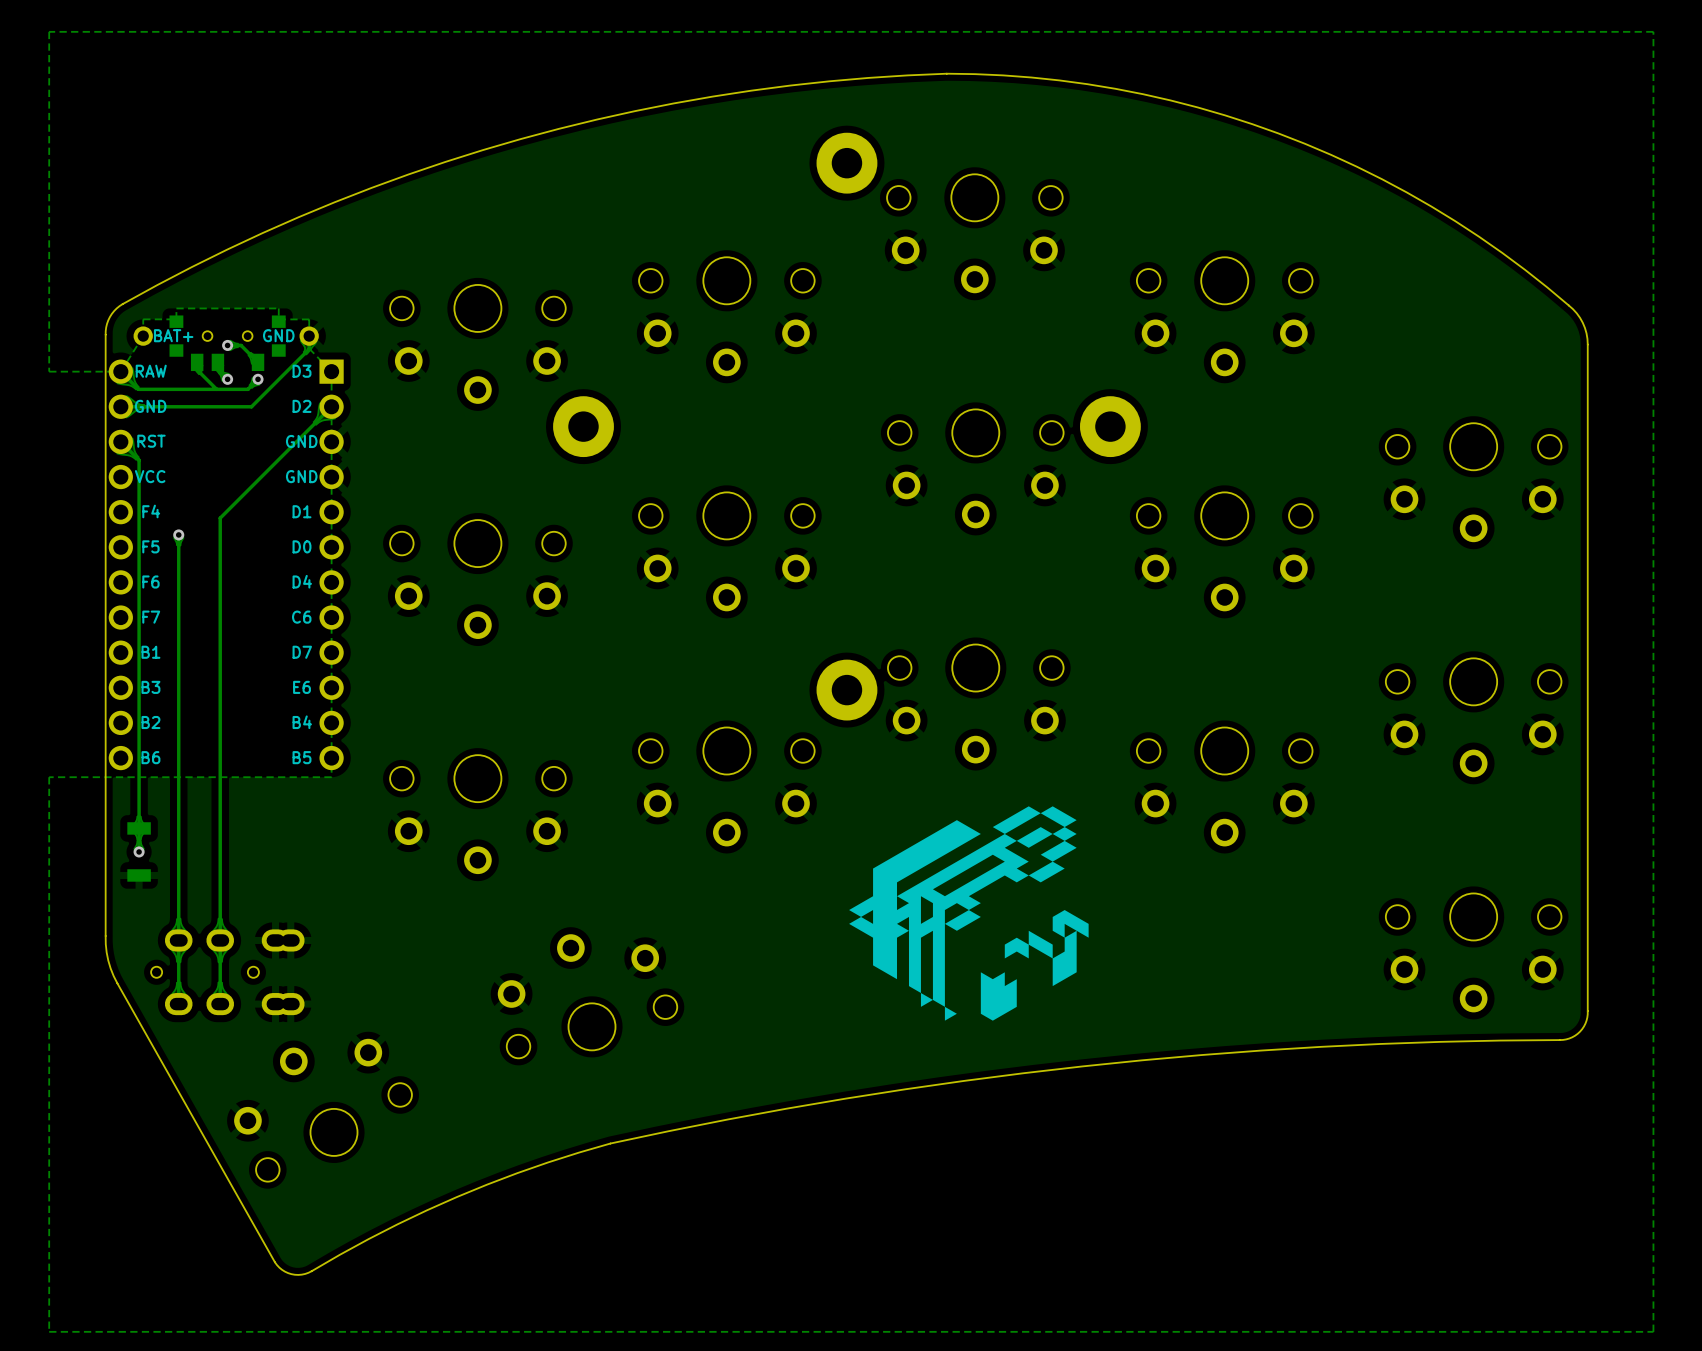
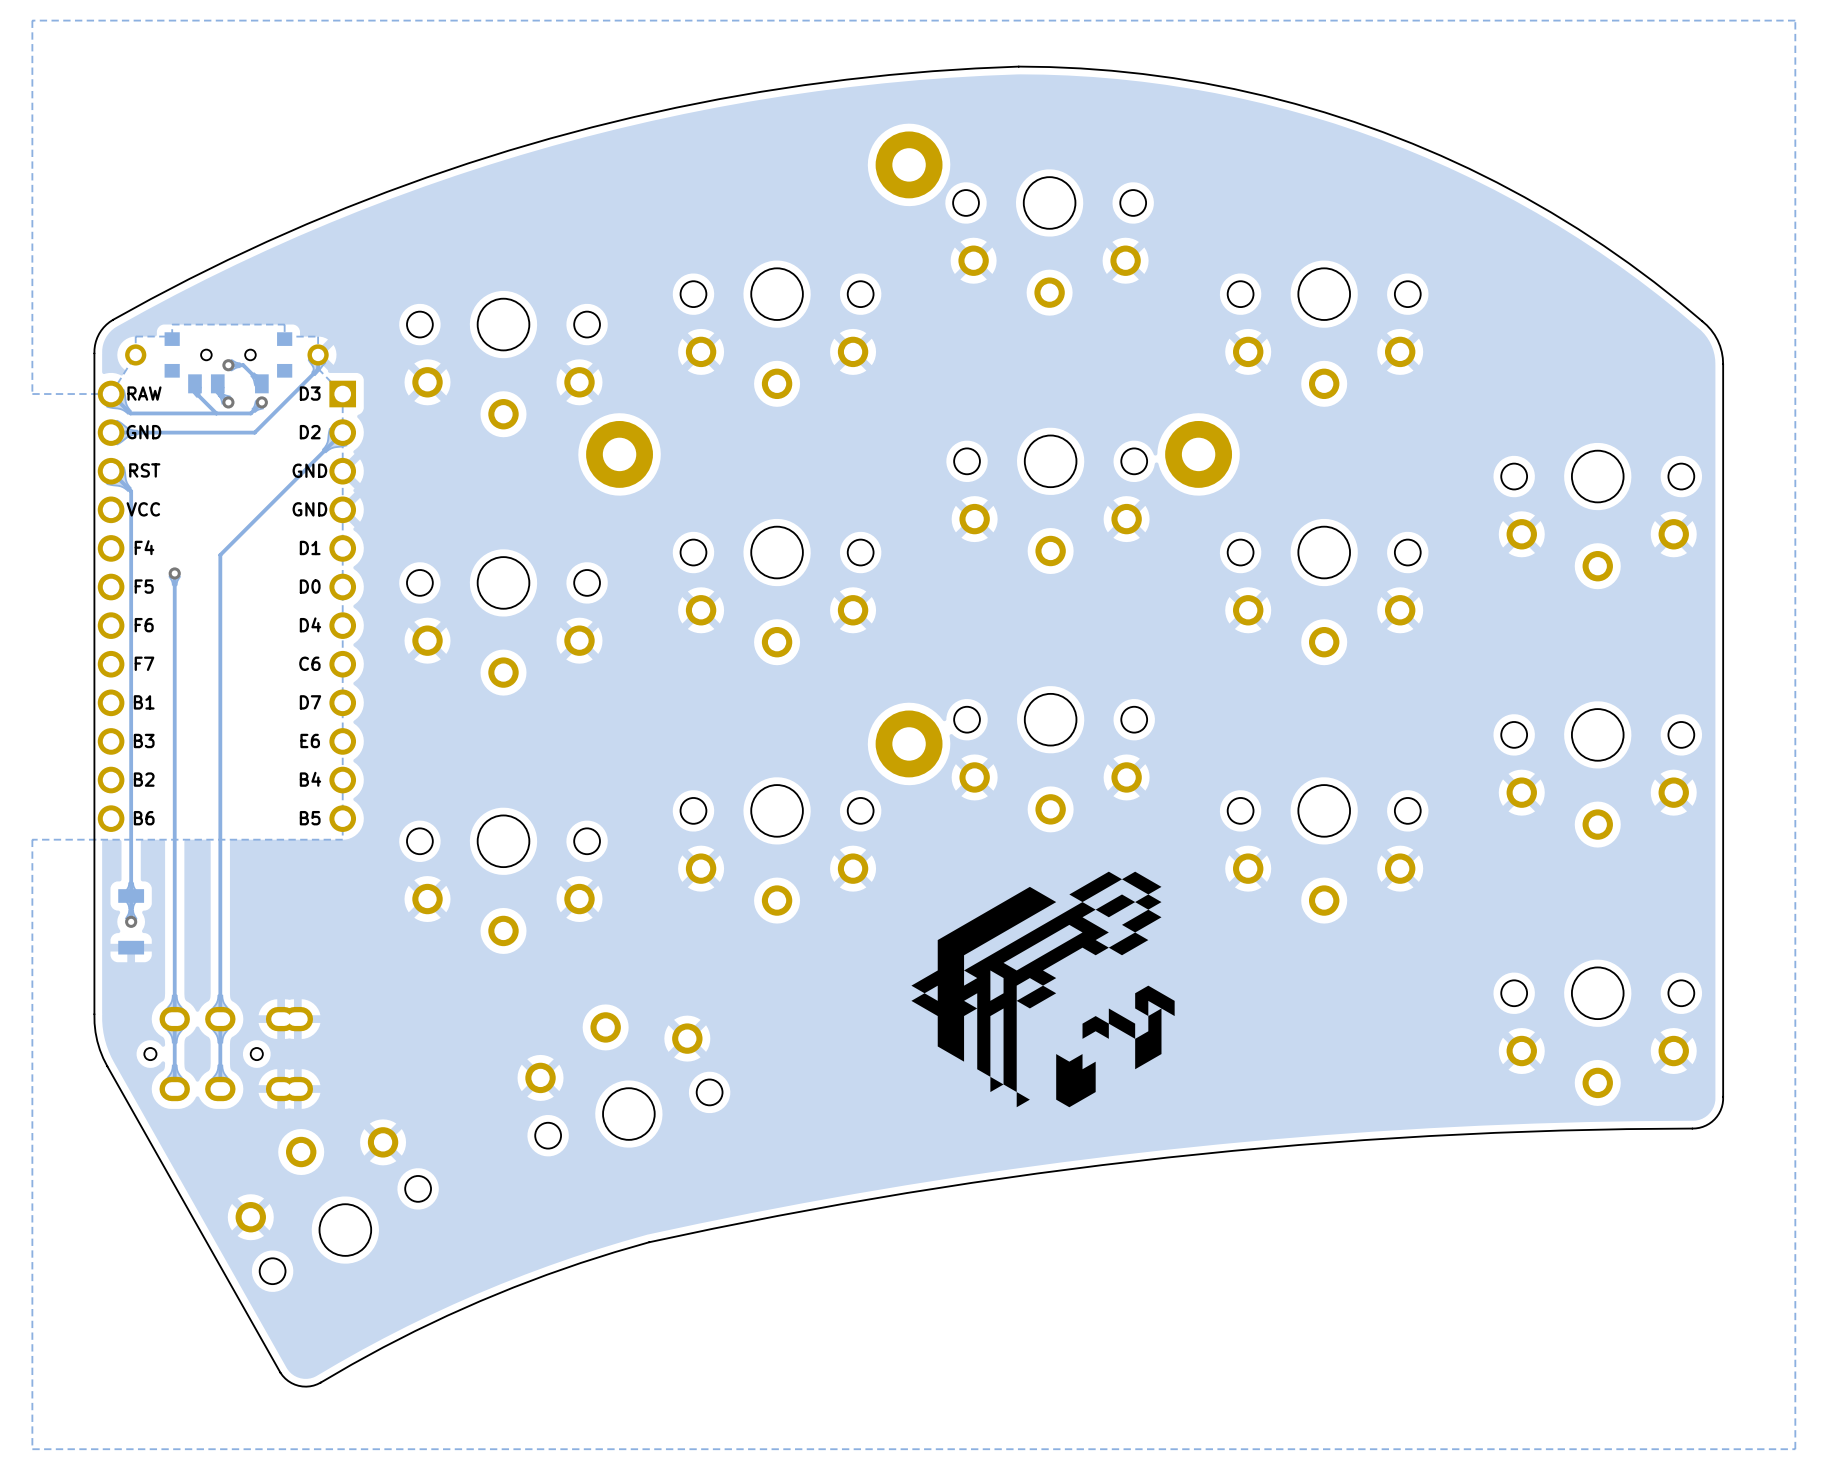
text: BAT+ (173, 335) -> none
text: GND (278, 335) -> none

